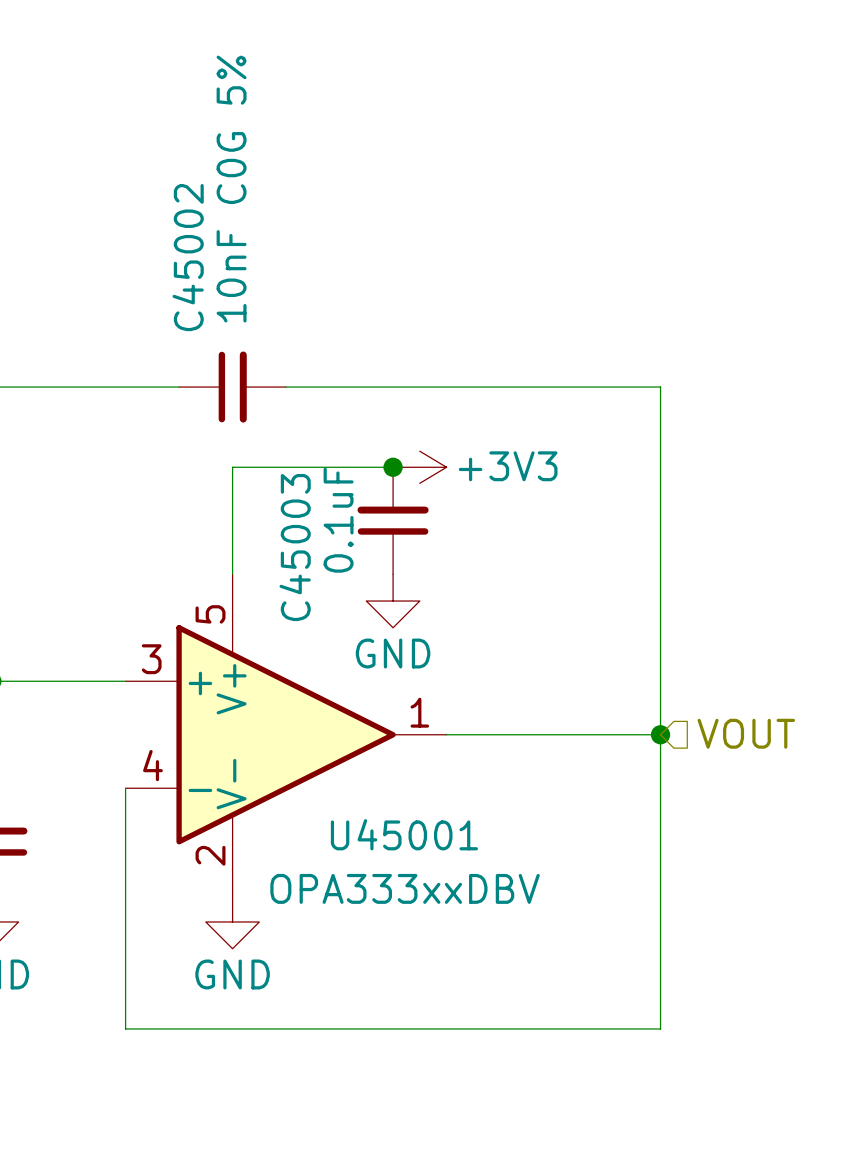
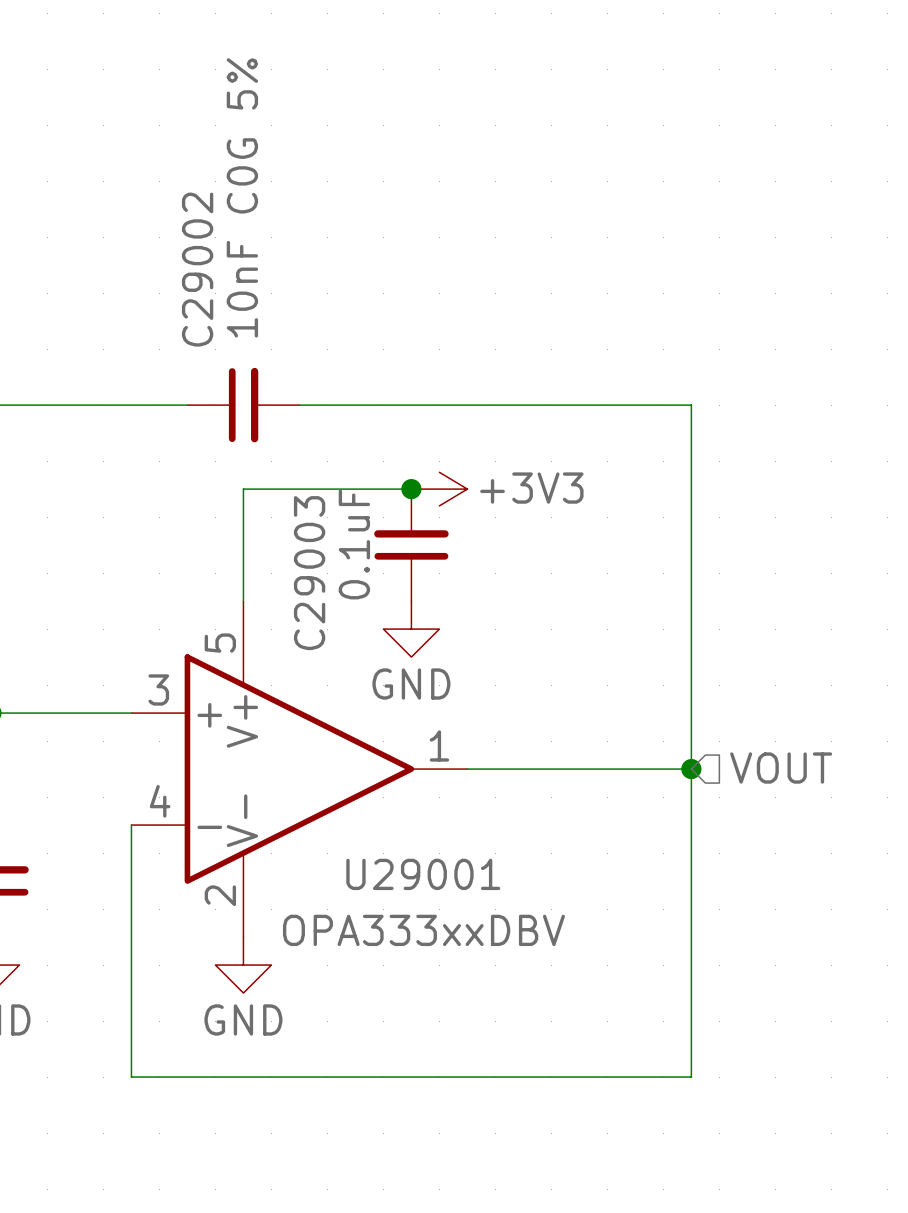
C45002 name: C45002 (188, 257) -> C29002 (197, 269)
C45003 name: C45003 (295, 547) -> C29003 (309, 573)
U45001 name: U45001 (404, 834) -> U29001 (423, 874)

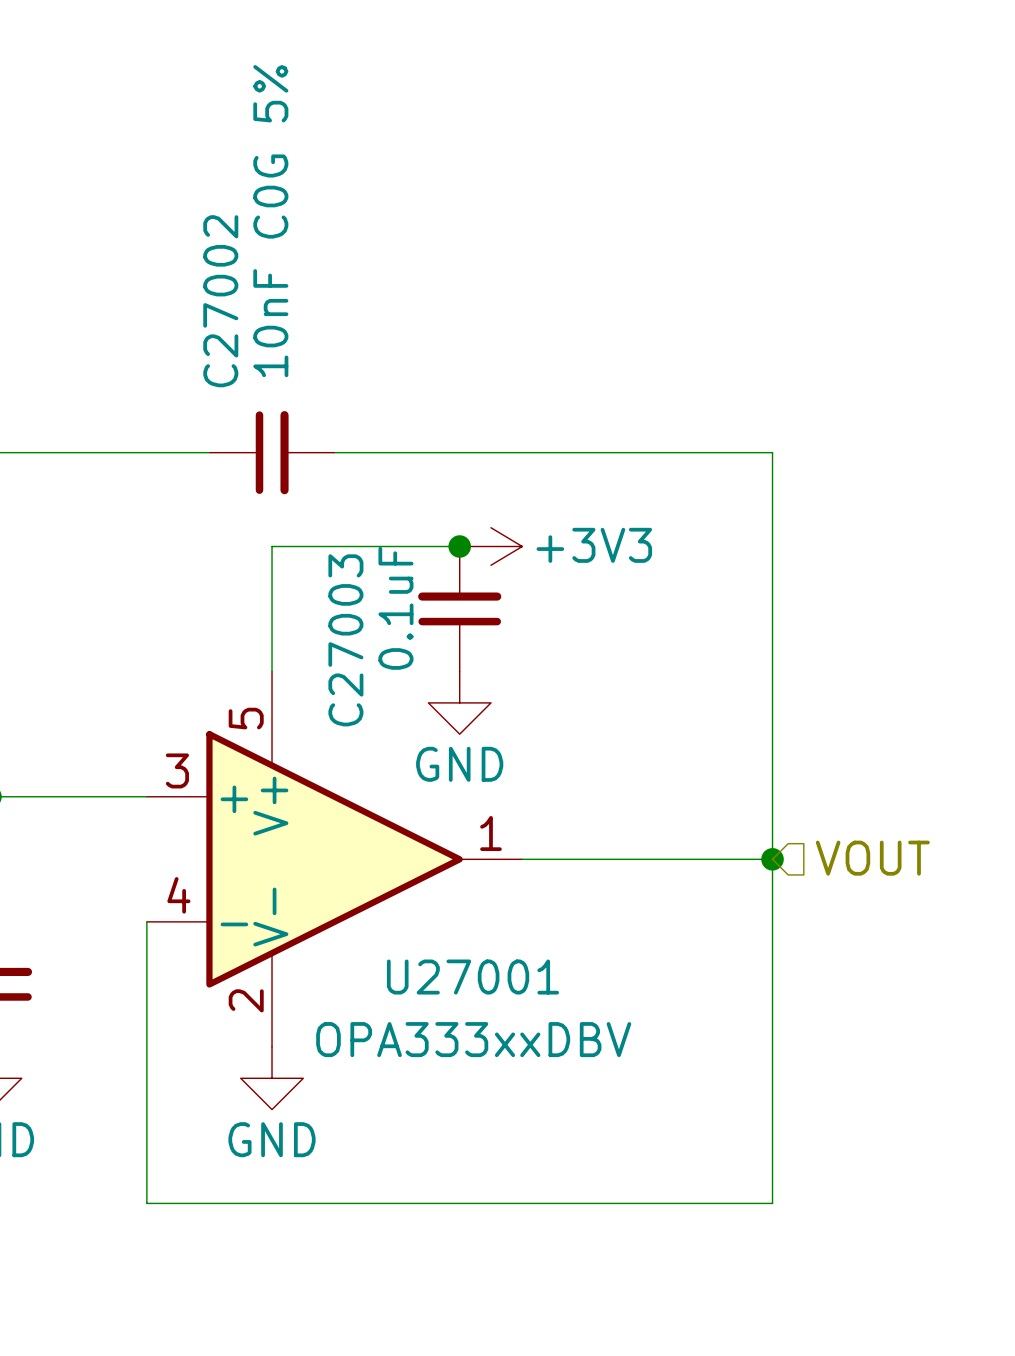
C29002 name: C29002 (197, 269) -> C27002 (220, 301)
C29003 name: C29003 (309, 573) -> C27003 (345, 640)
U29001 name: U29001 (423, 874) -> U27001 (472, 977)

